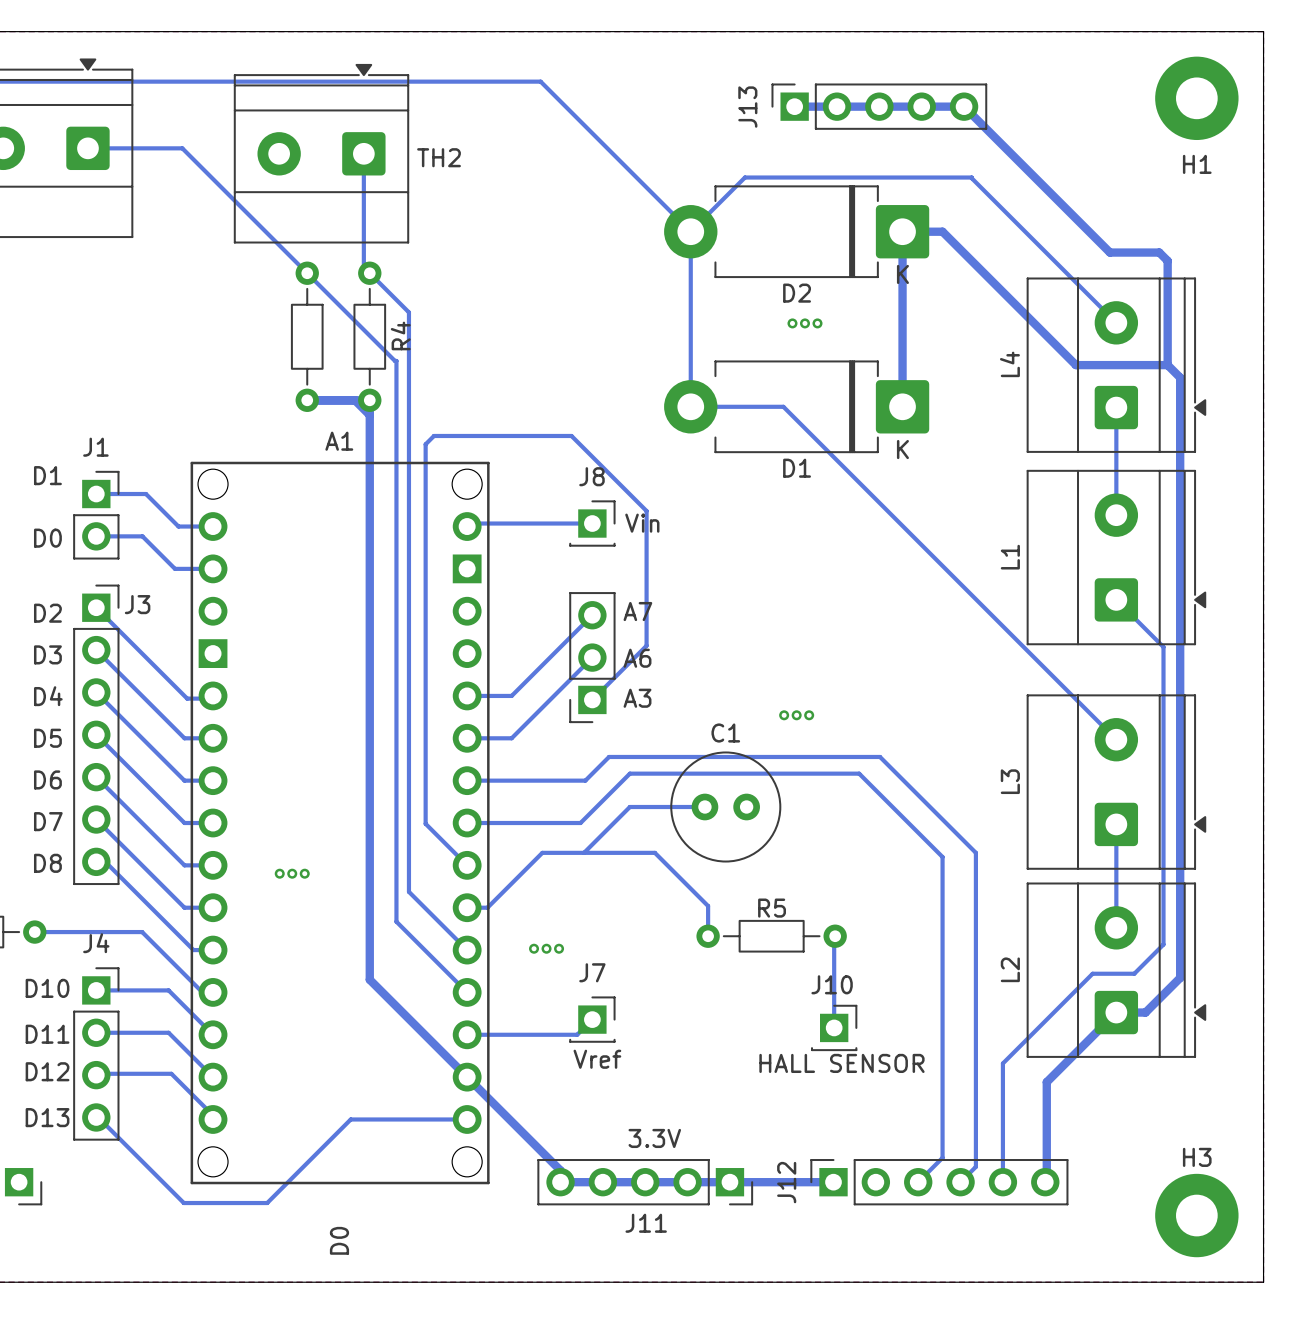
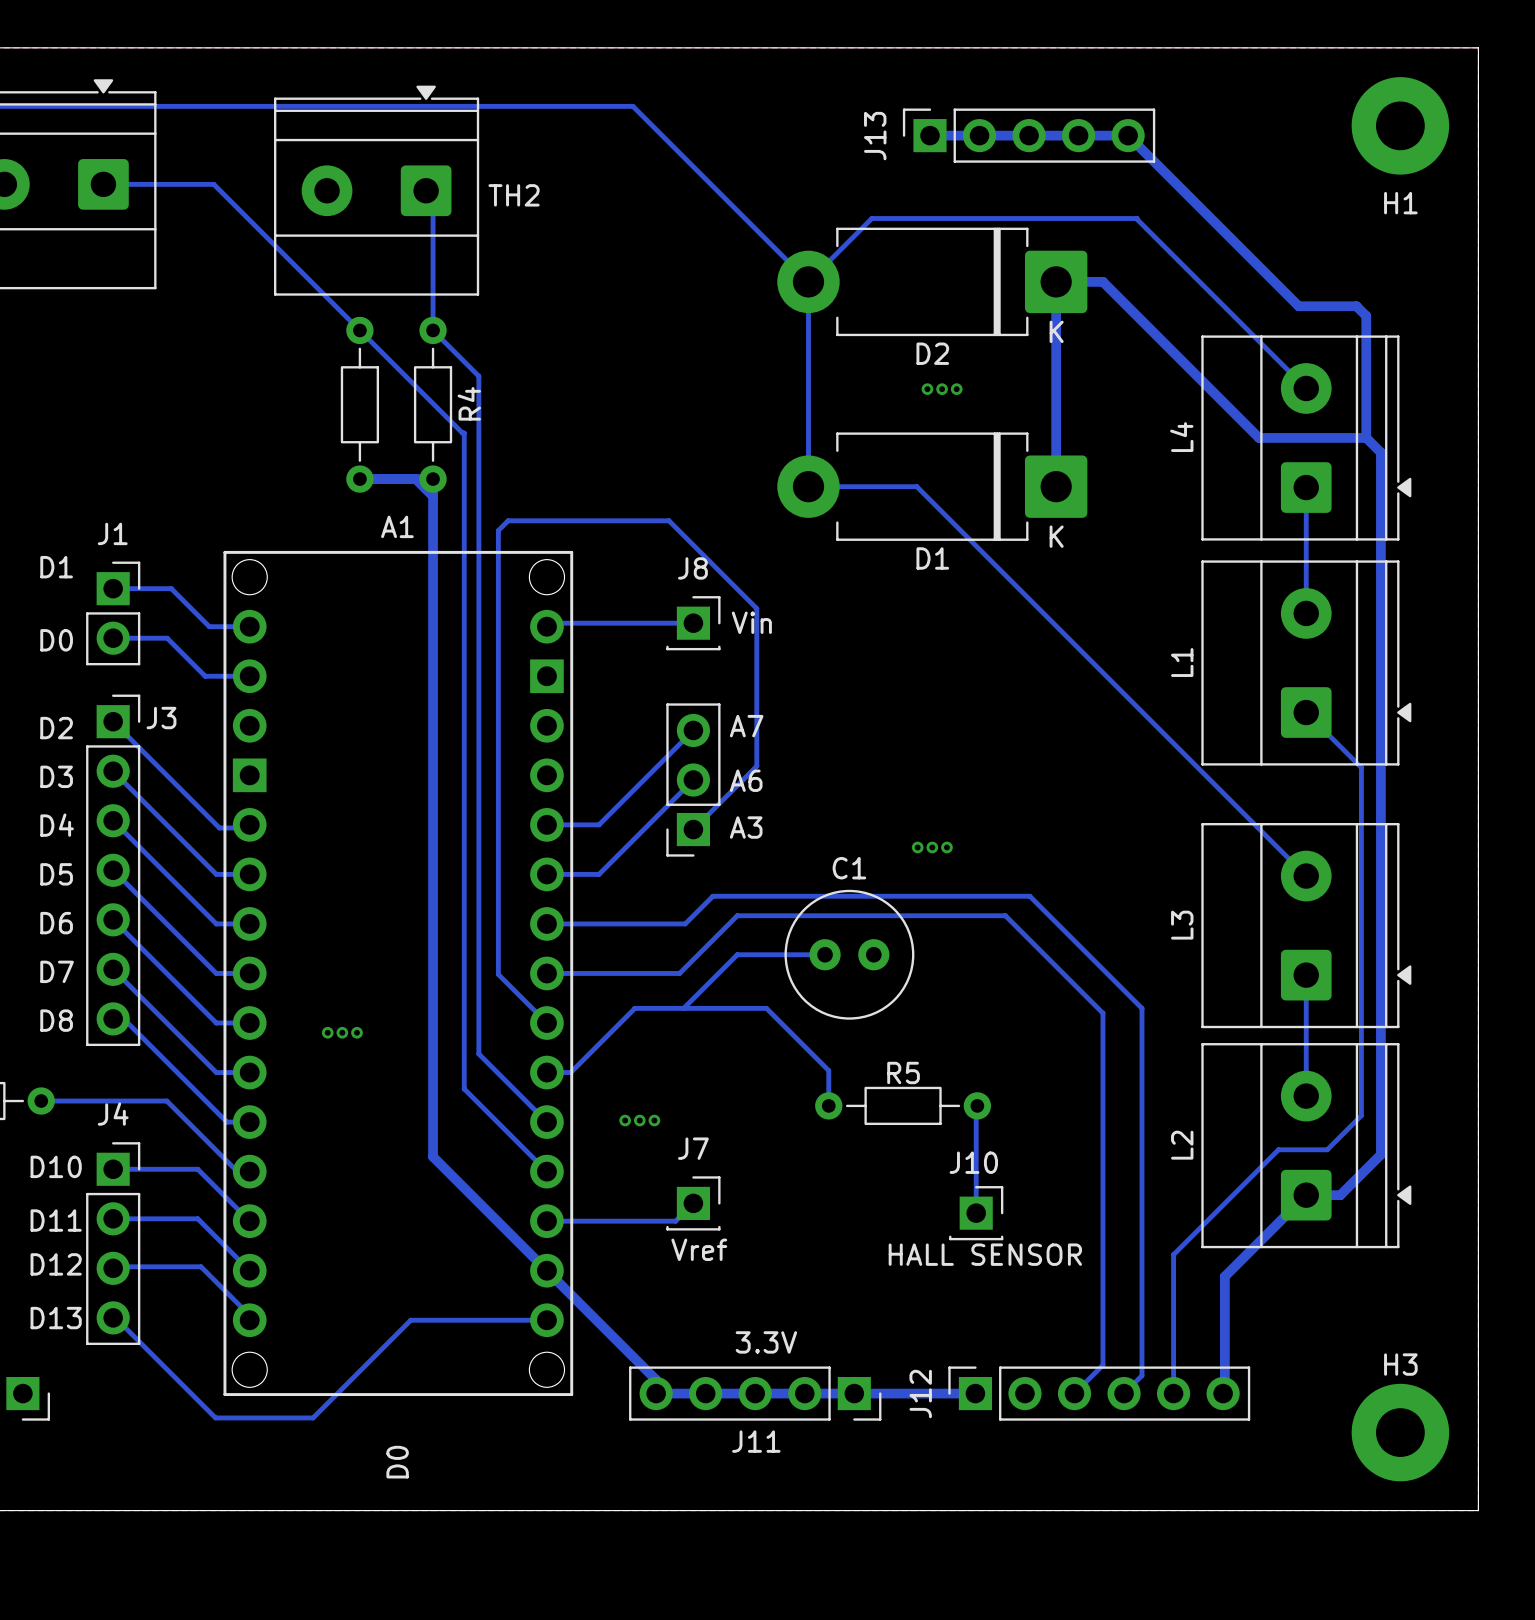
bottom track: none -> (426, 185) (433, 192) (433, 330)
bottom track: (363, 153) (363, 267) -> none

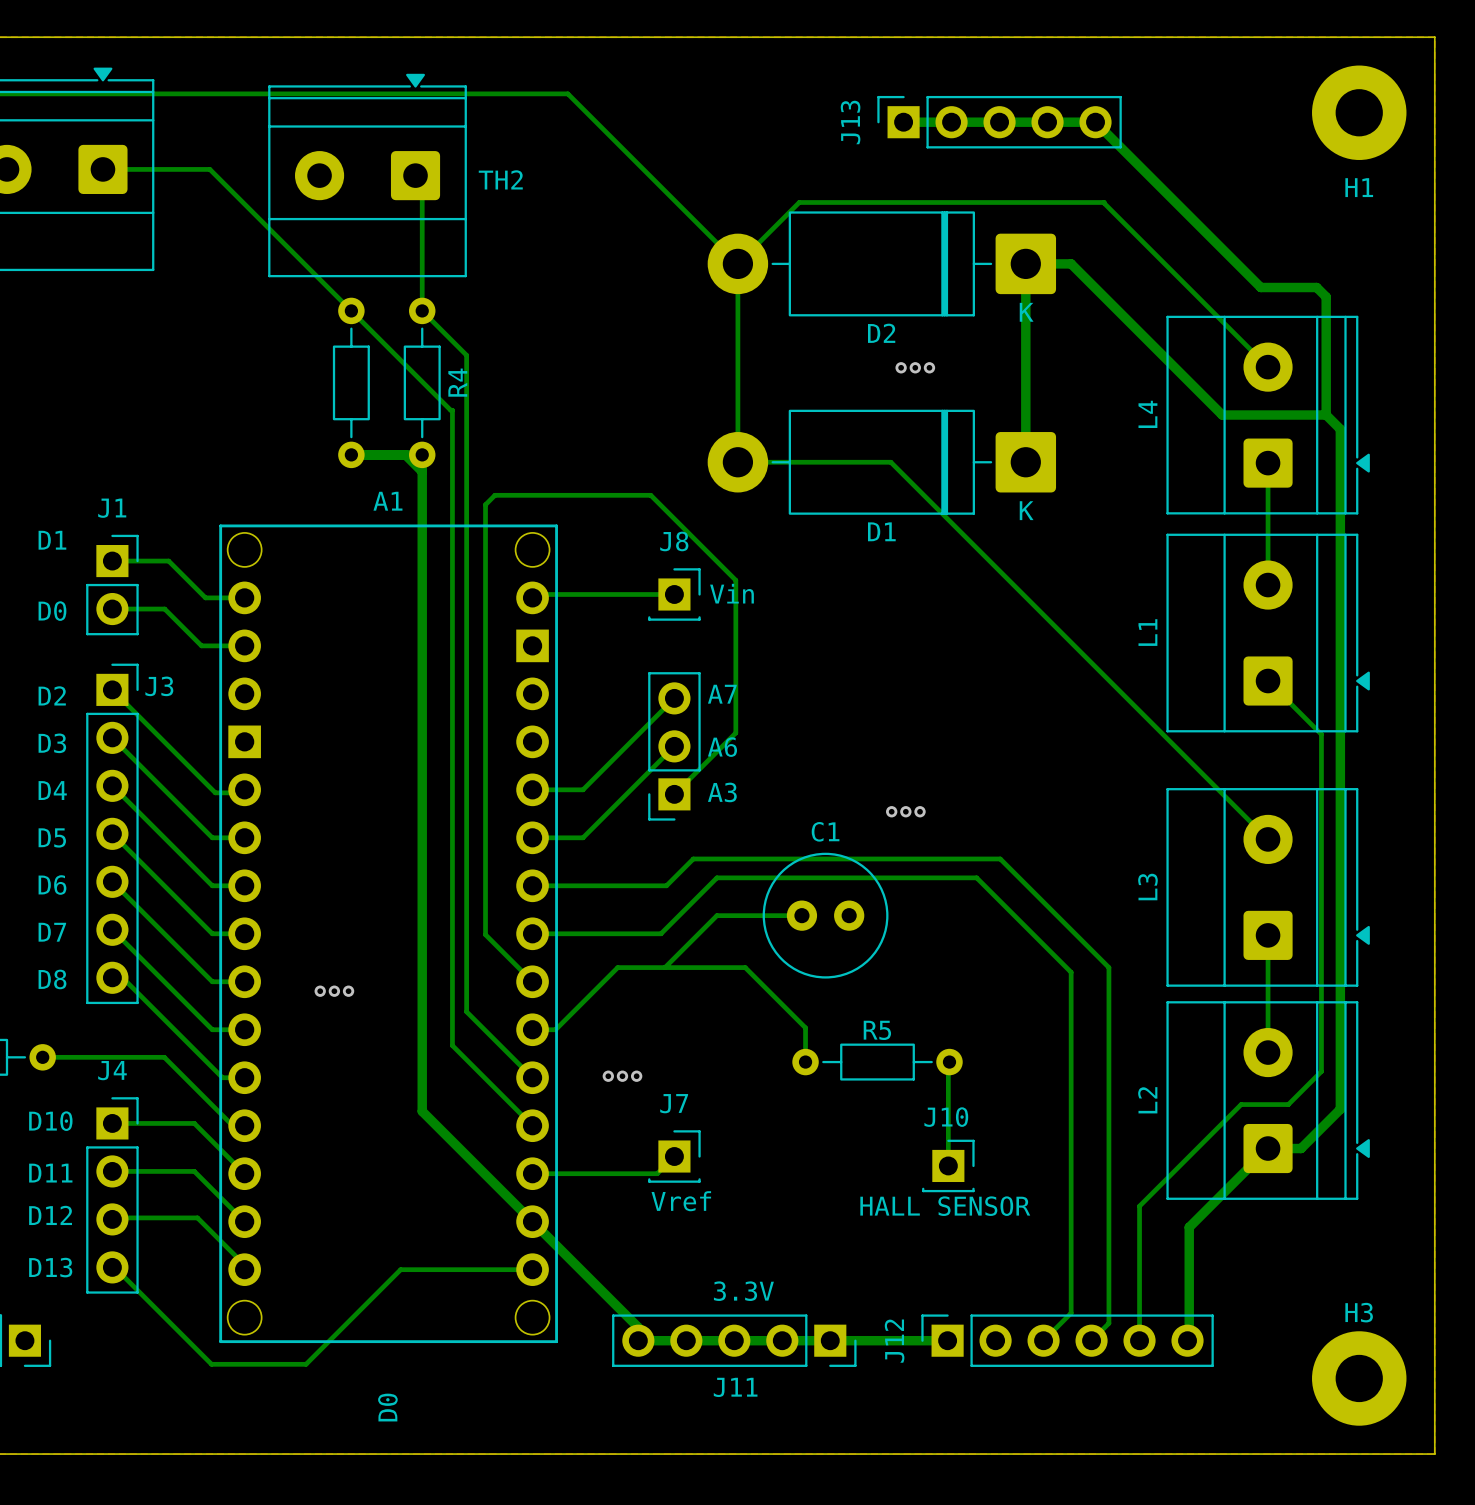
bottom track: (583, 106) (632, 106) (808, 281) -> (567, 93) (737, 263)
bottom track: (871, 218) (808, 281) -> (847, 202) (799, 202) (737, 263)
D2 footprint: [777, 227, 1088, 337] -> [707, 211, 1057, 317]
bottom track: (808, 281) (808, 486) -> (737, 263) (737, 462) (785, 462)
D1 footprint: [777, 432, 1088, 541] -> [707, 409, 1057, 515]

